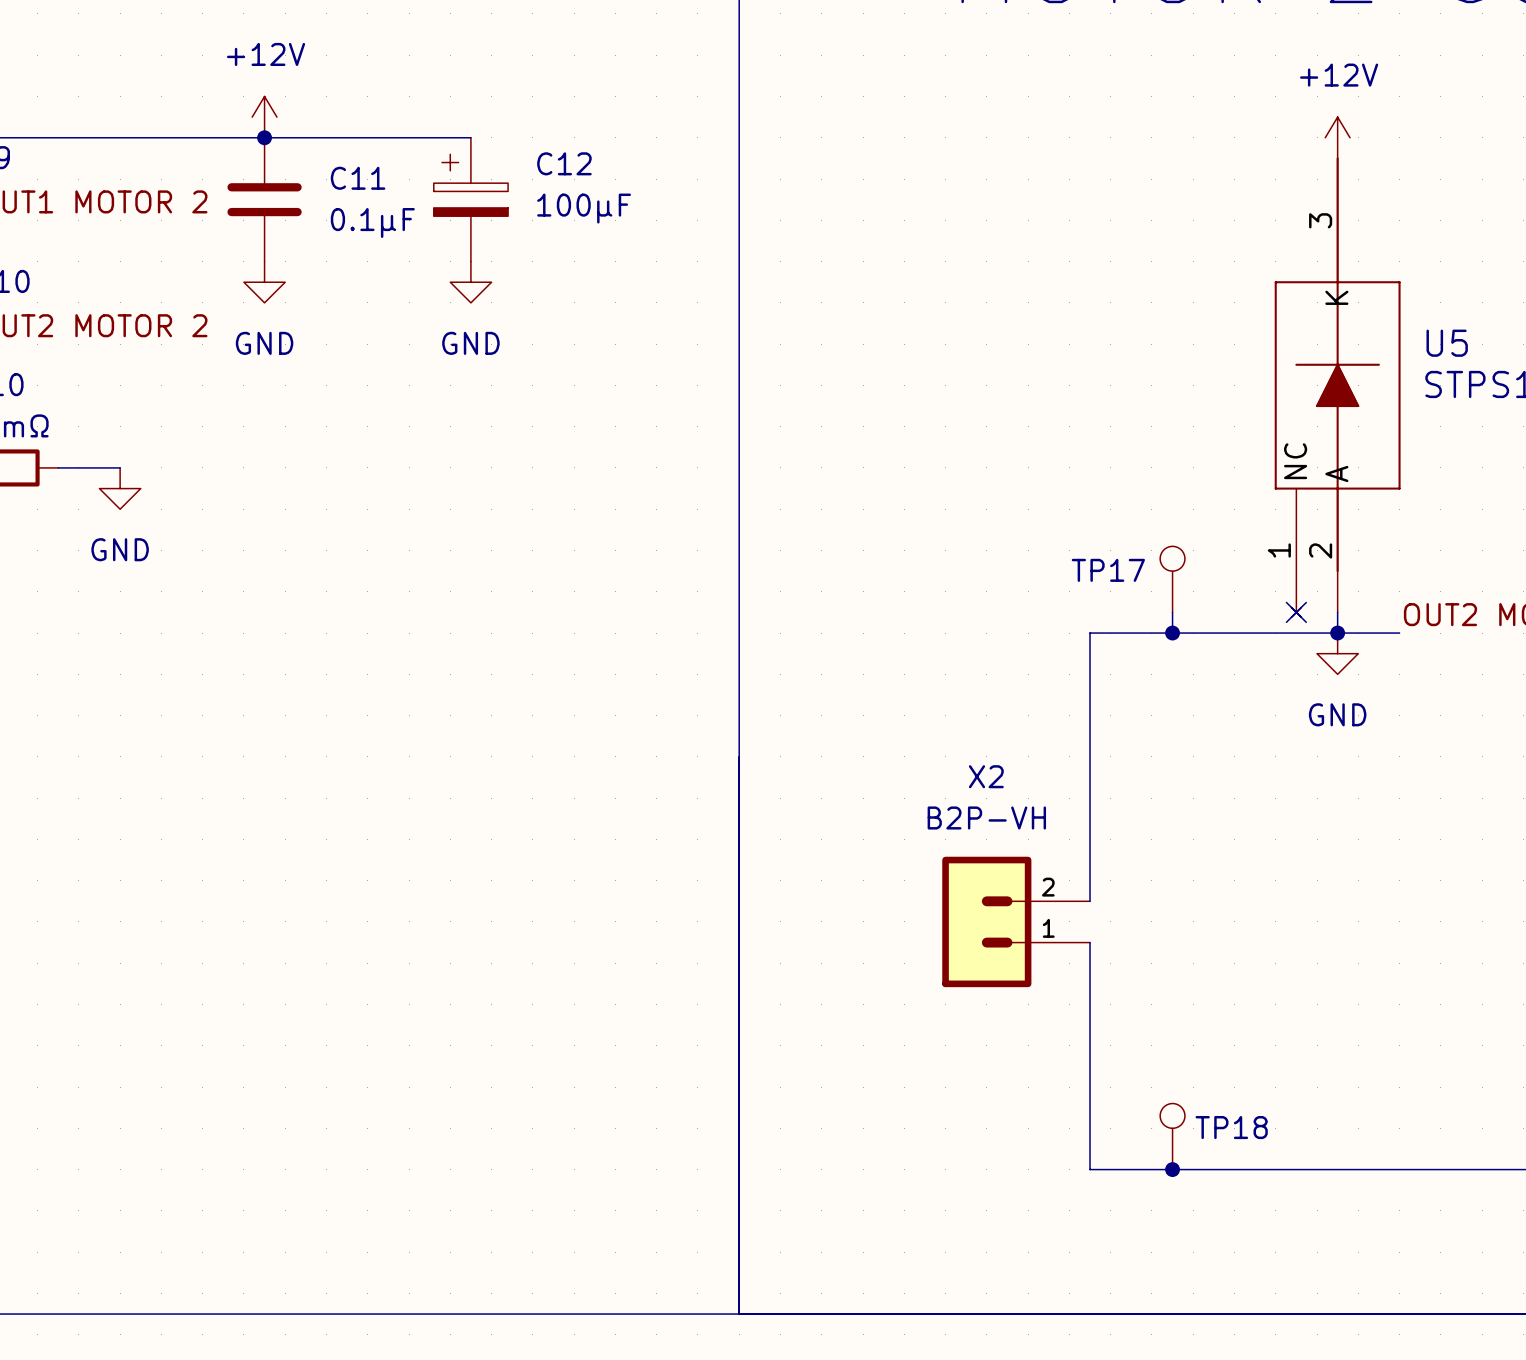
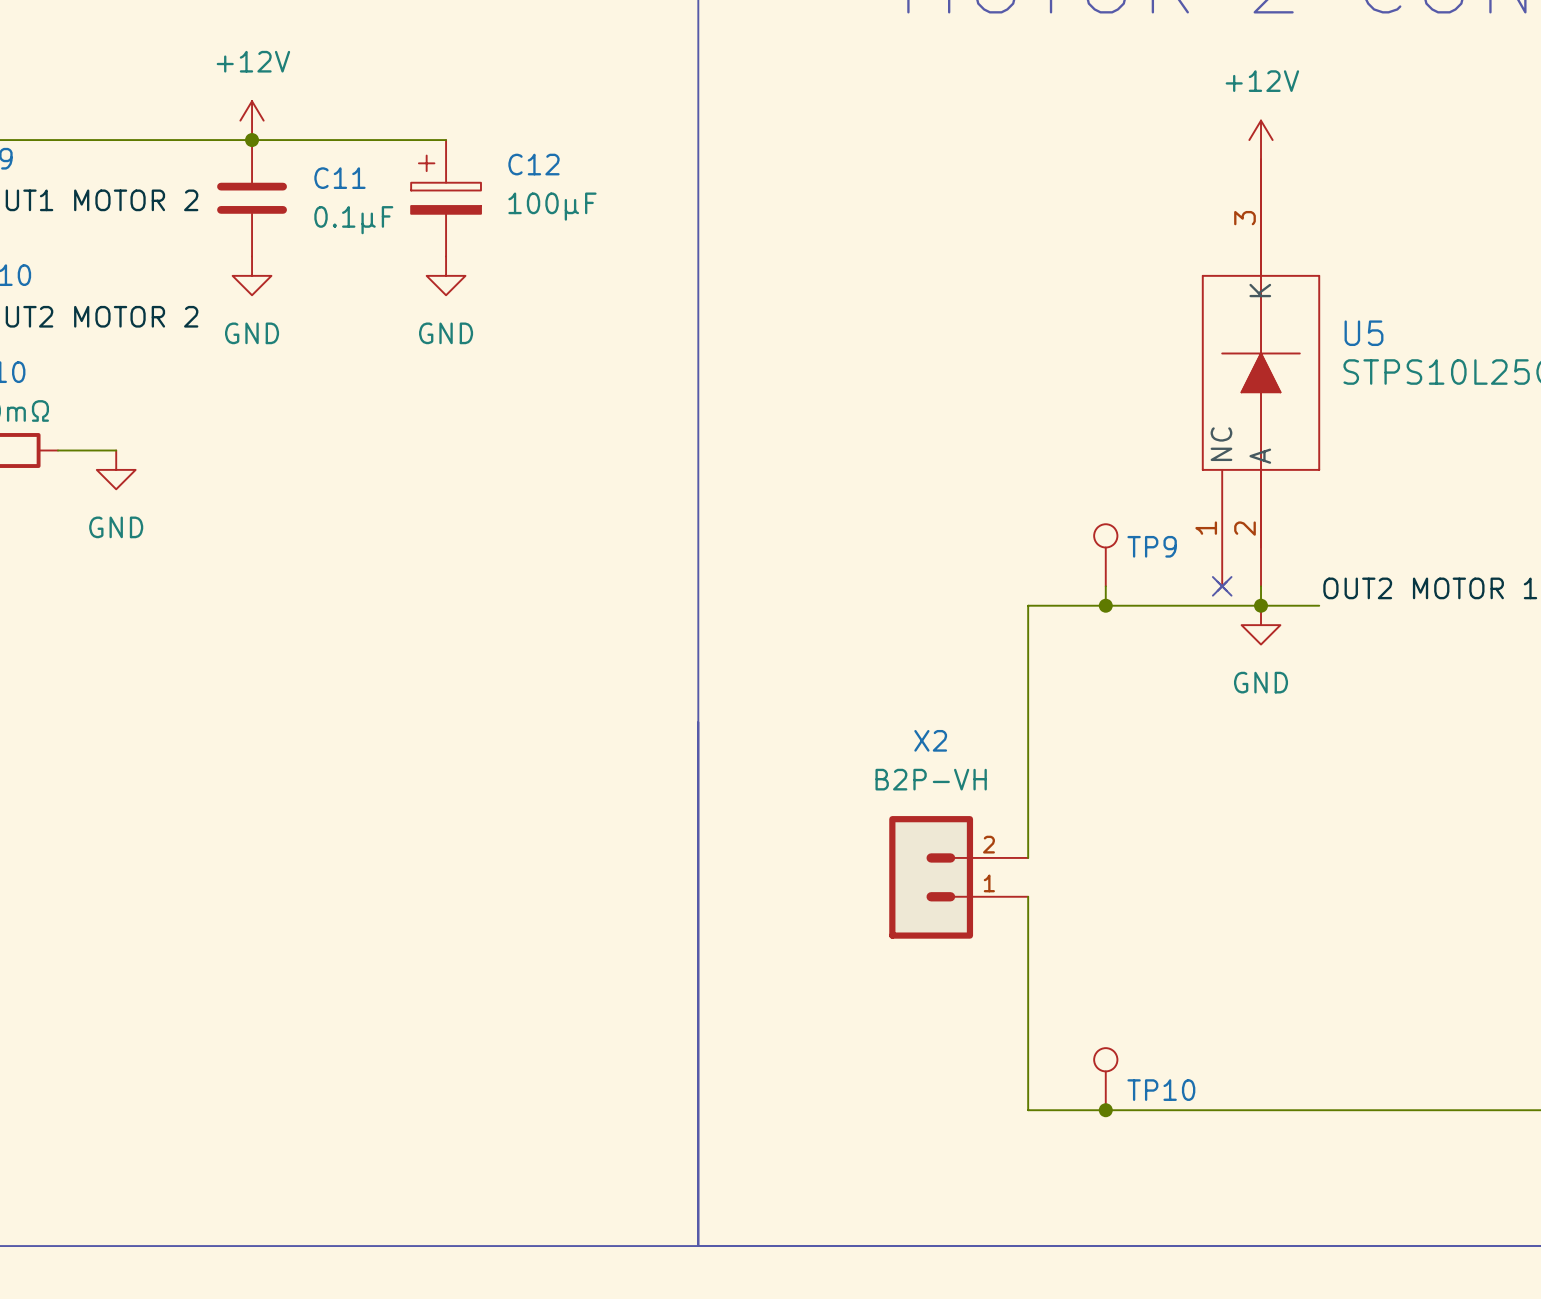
TP17 name: TP17 (1108, 570) -> TP9 (1152, 546)
TP18 name: TP18 (1231, 1127) -> TP10 (1161, 1090)

